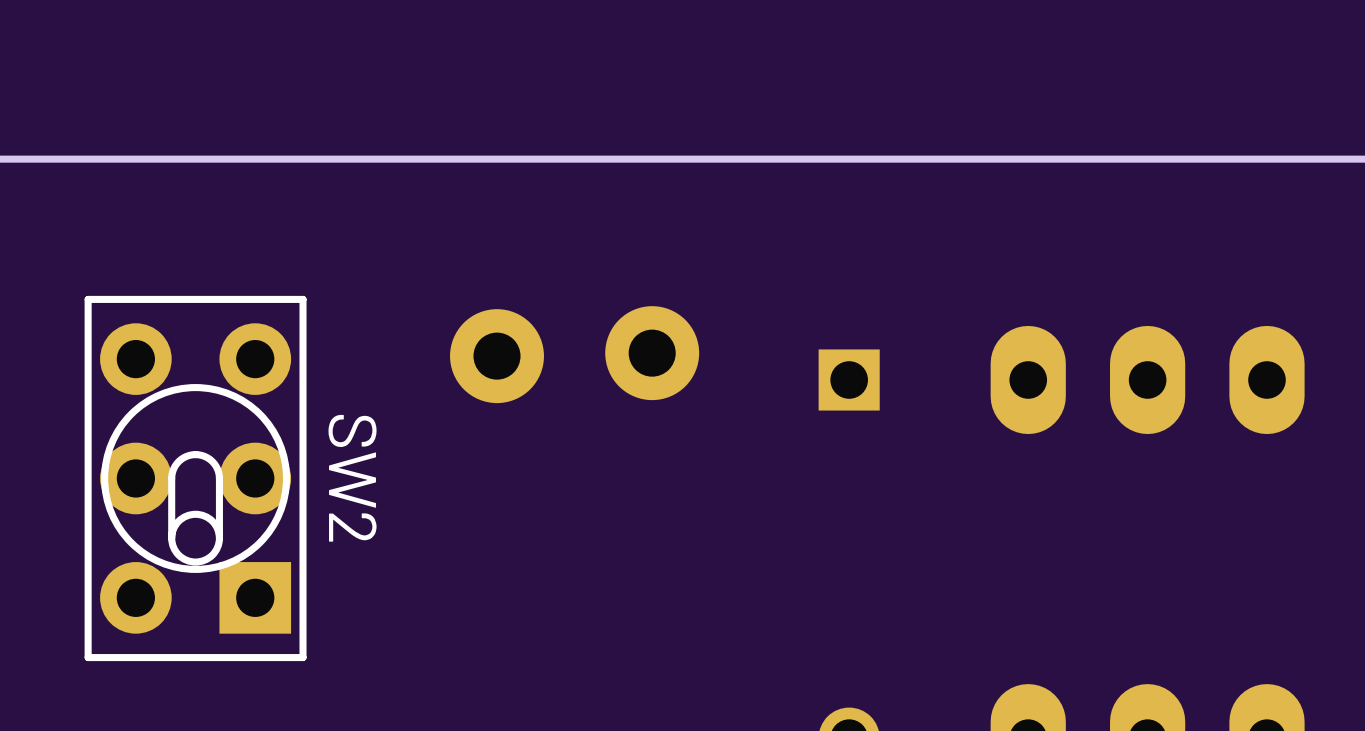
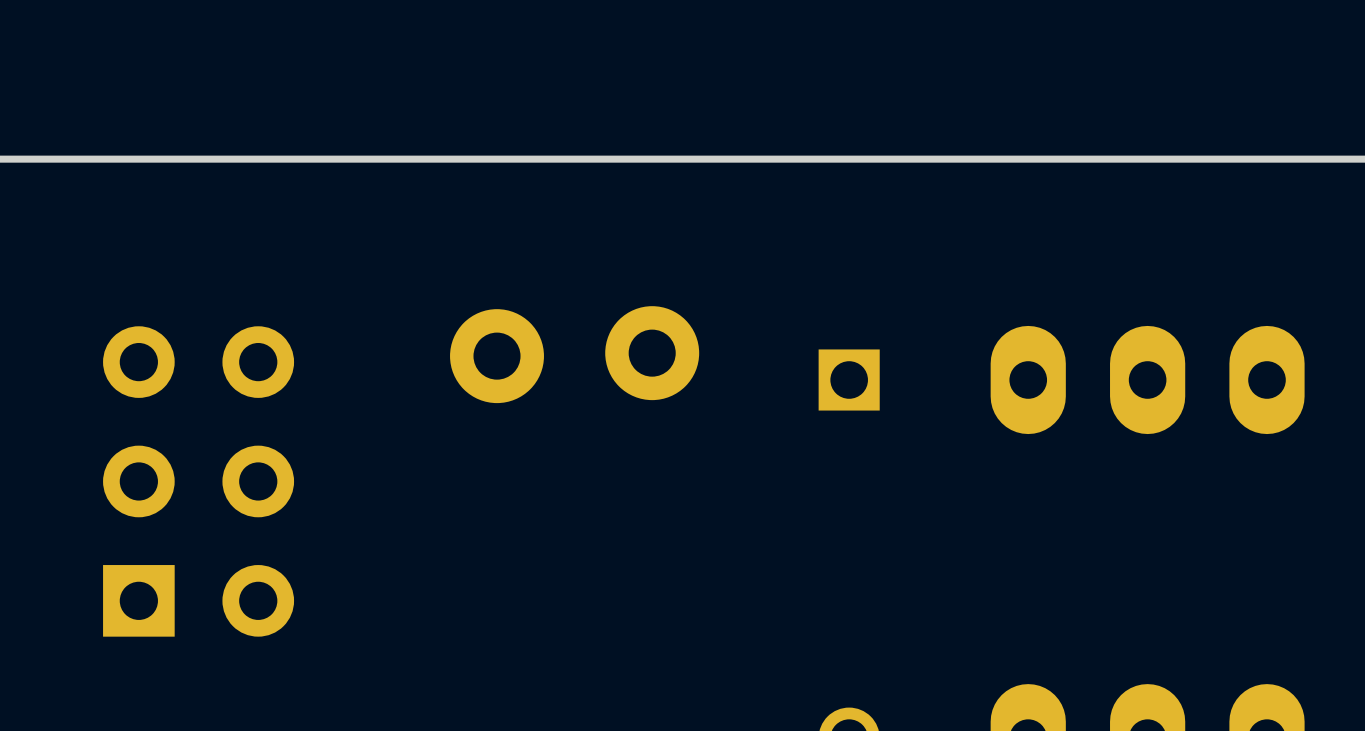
SW2 side: bottom (195, 478) -> top (198, 481)

